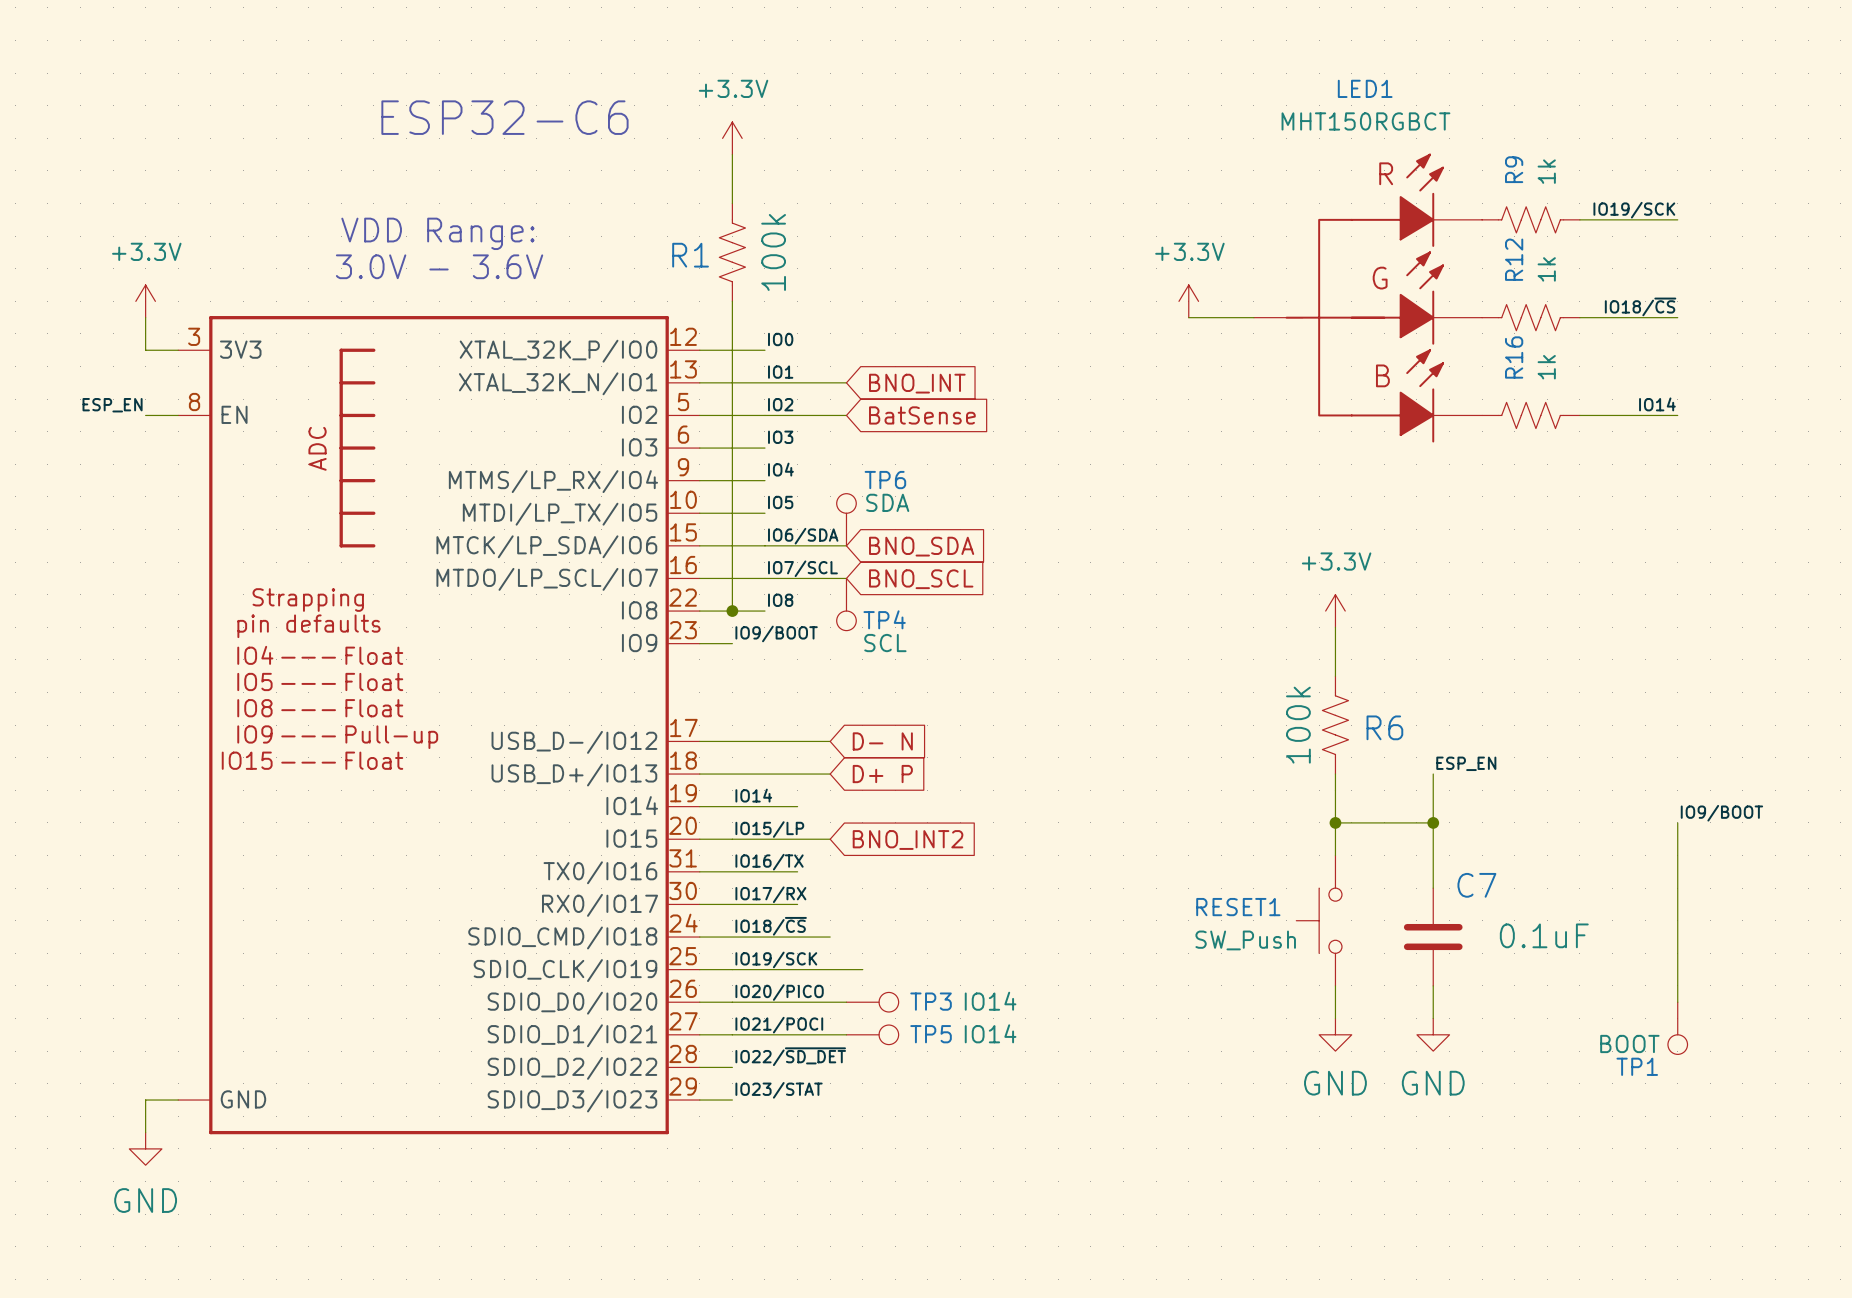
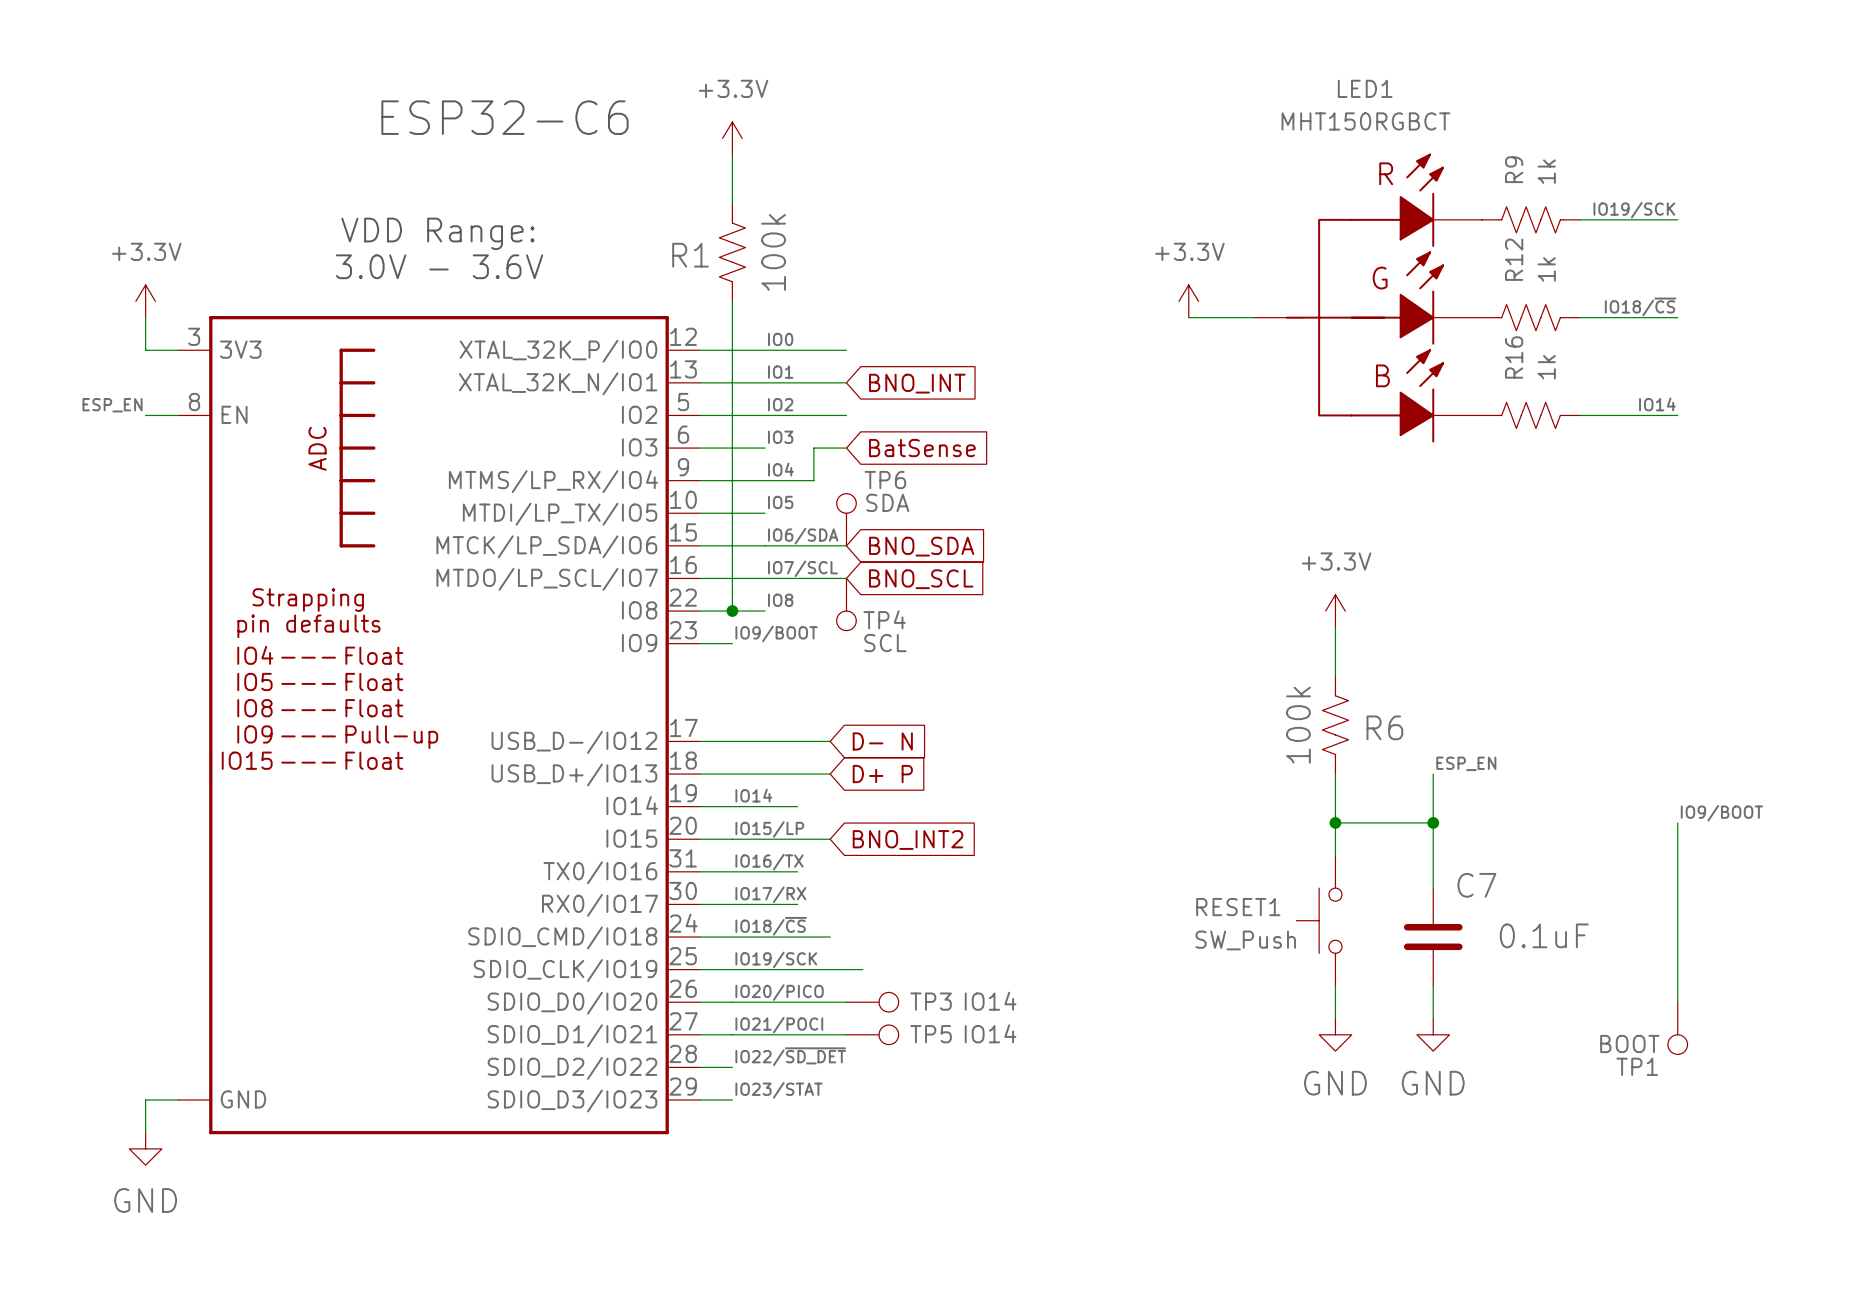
wire: none -> (764, 350) (846, 350)
global label position: BatSense (922, 415) -> BatSense (922, 448)
wire: none -> (846, 448) (813, 448) (813, 480) (764, 480)

